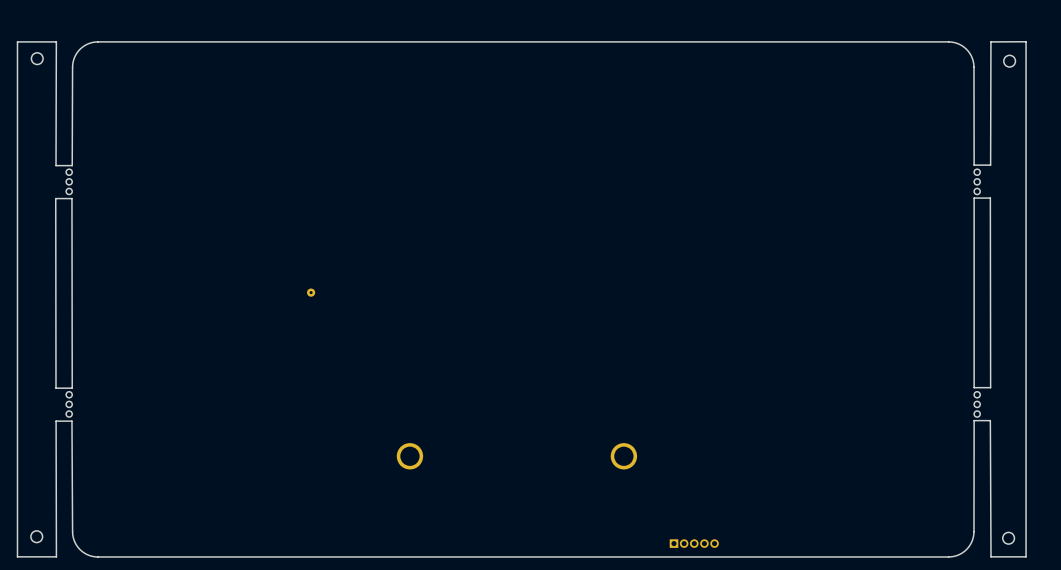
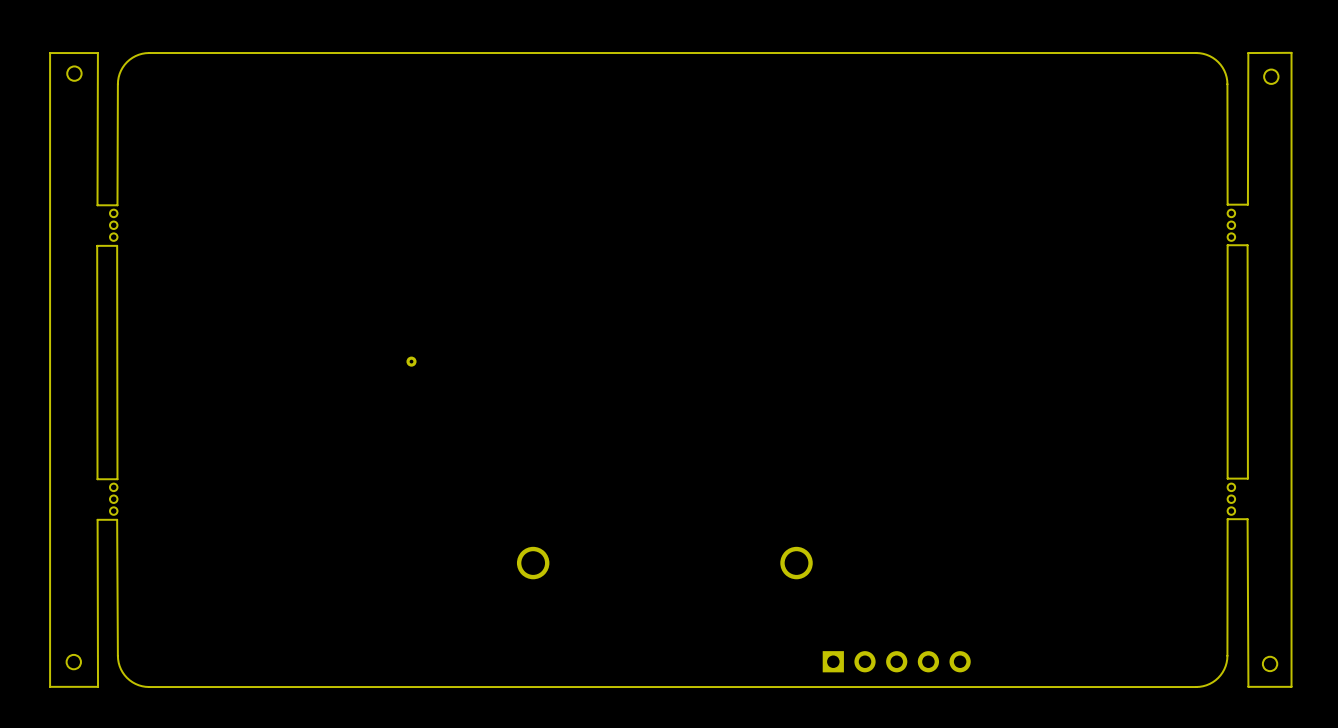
part: none -> (896, 661)
part: (694, 543) -> none

